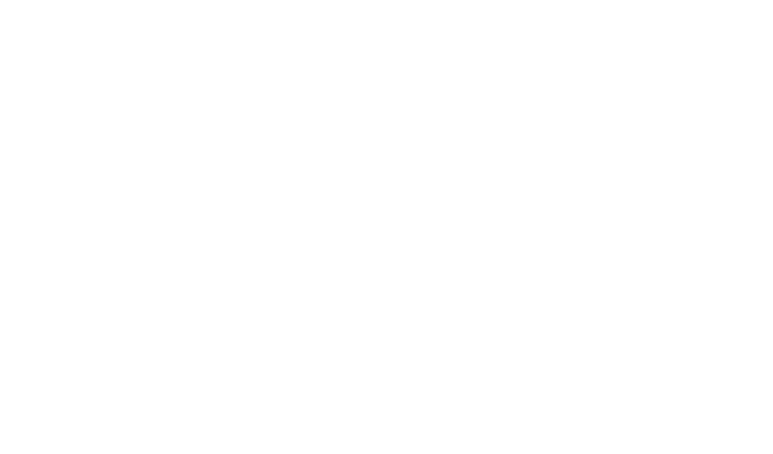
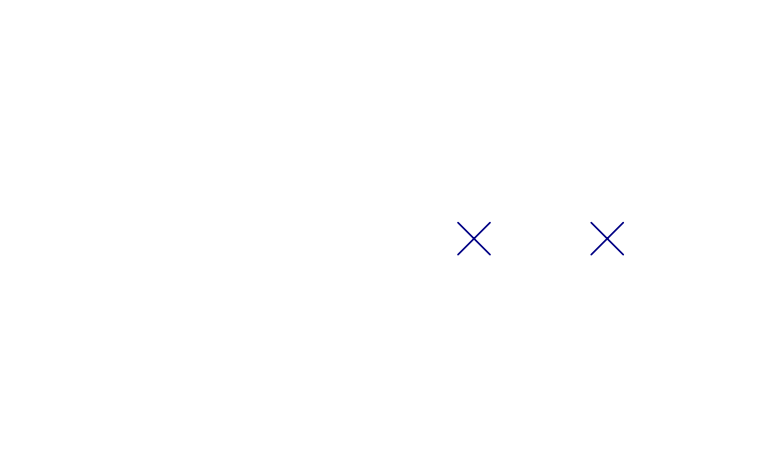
no-connect mark: none -> (474, 238)
no-connect mark: none -> (607, 238)

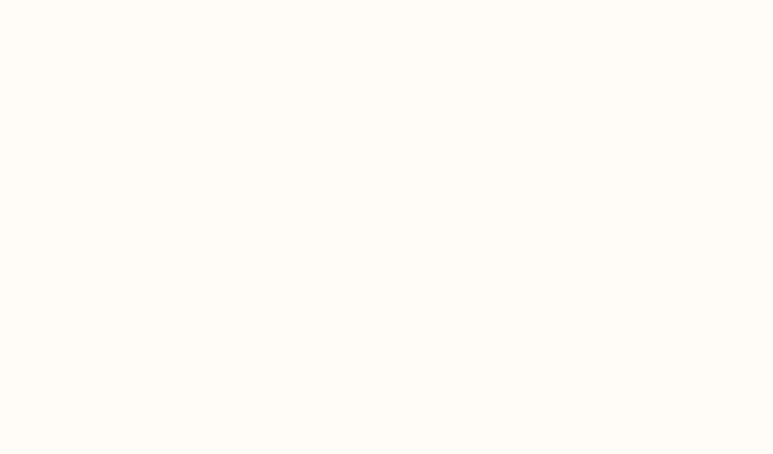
no-connect mark: (474, 238) -> none
no-connect mark: (607, 238) -> none

